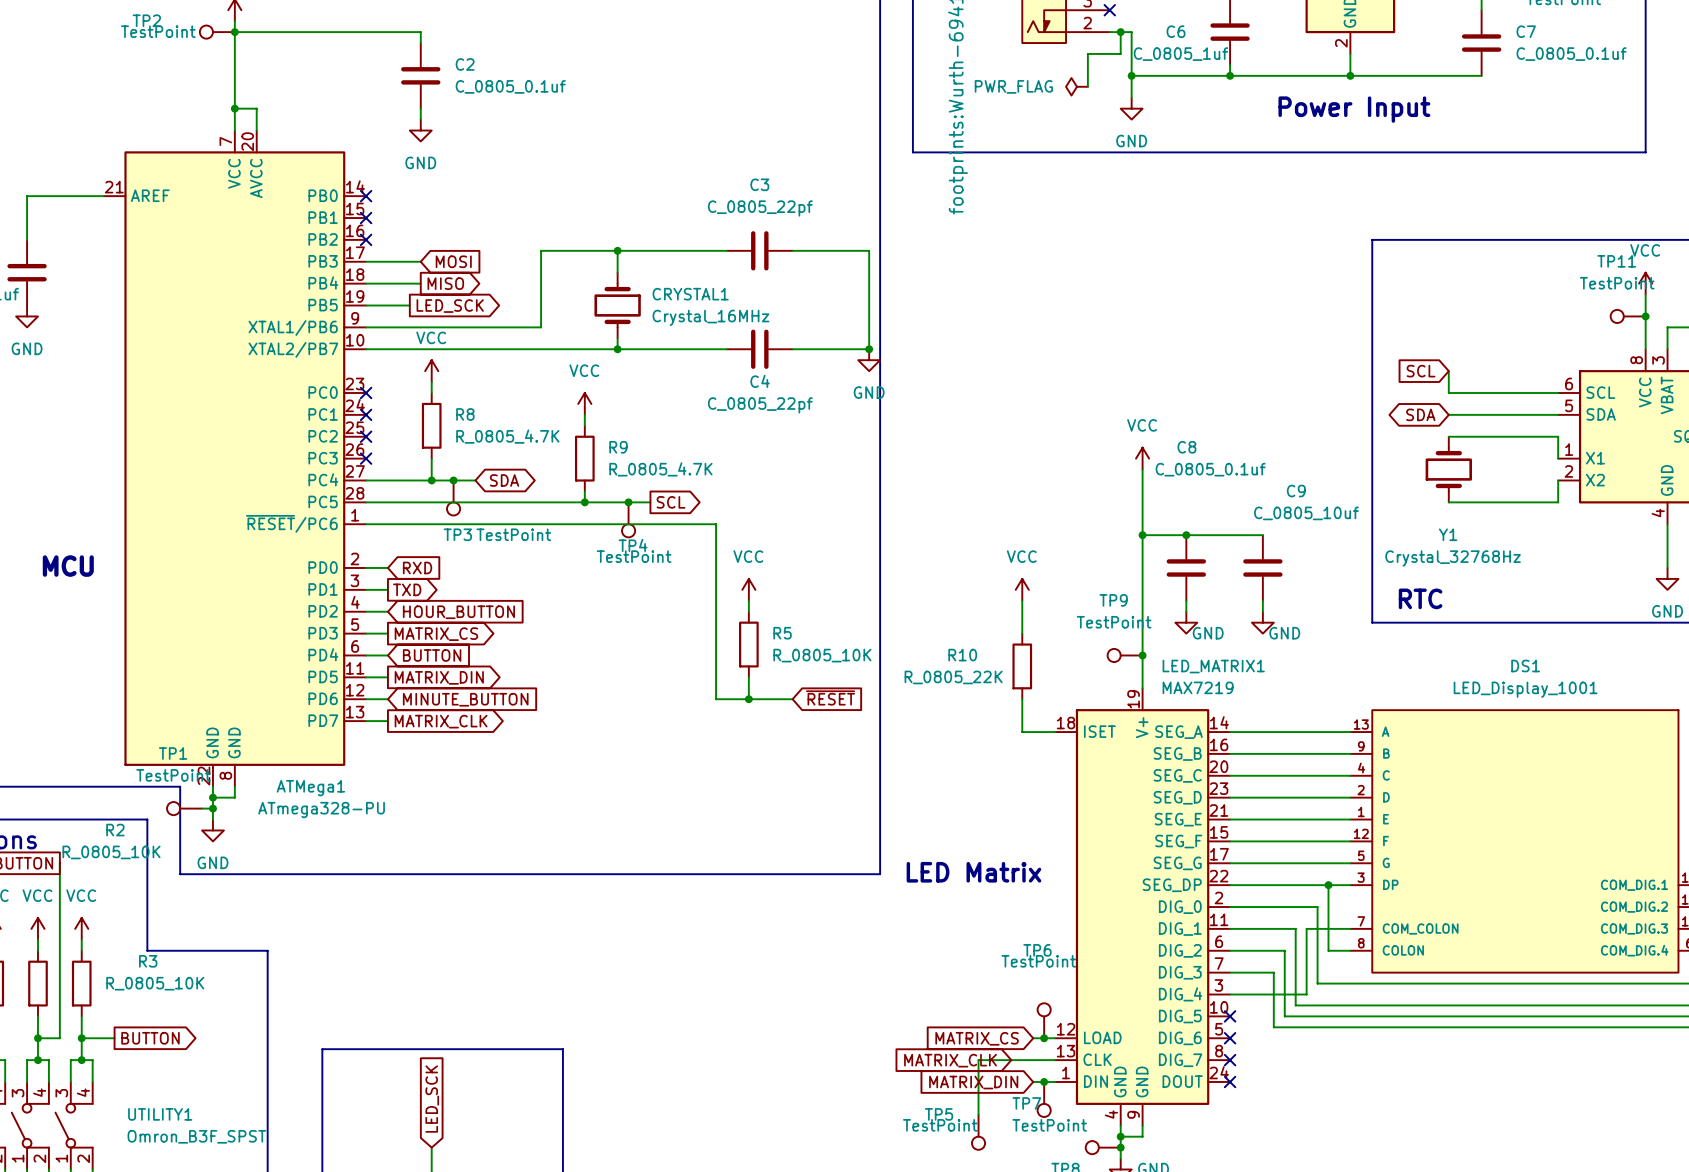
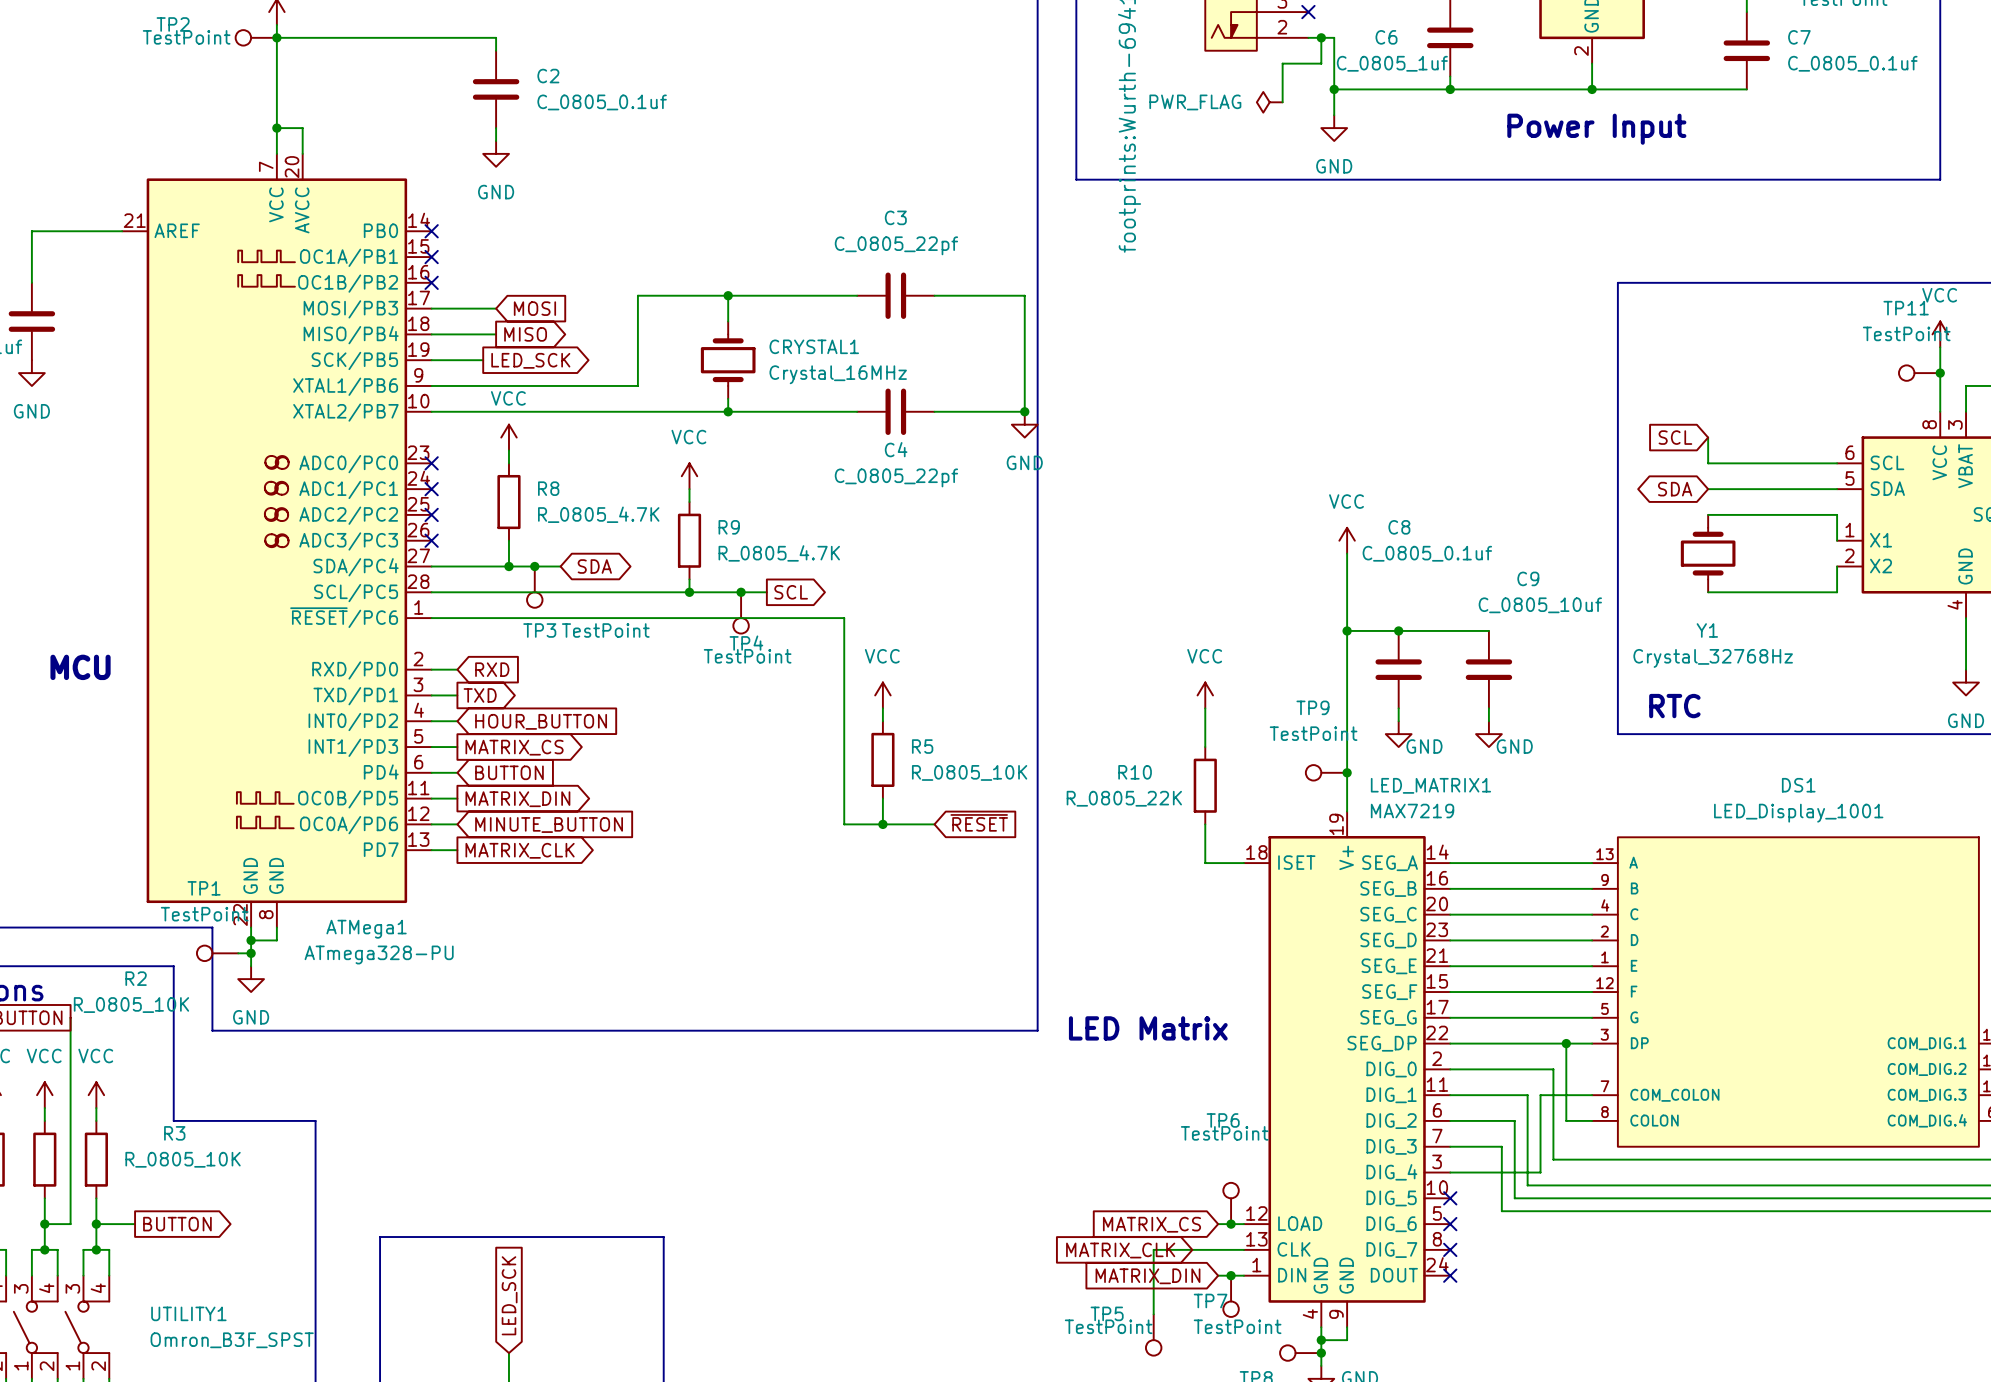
ATMega1 symbol: [103, 130, 367, 787] -> [122, 153, 432, 928]

